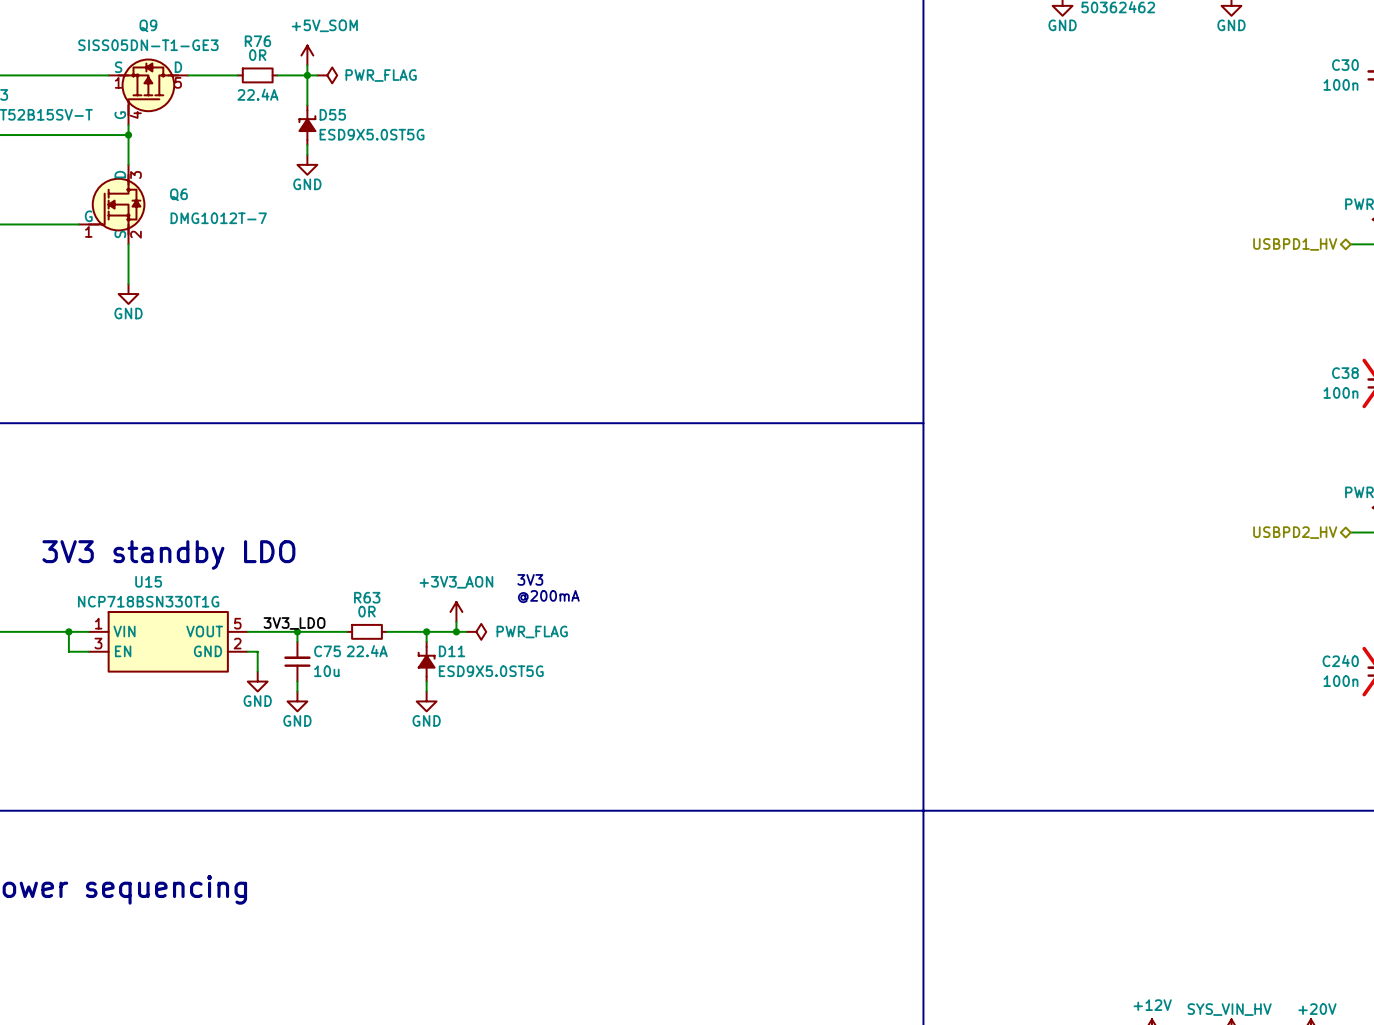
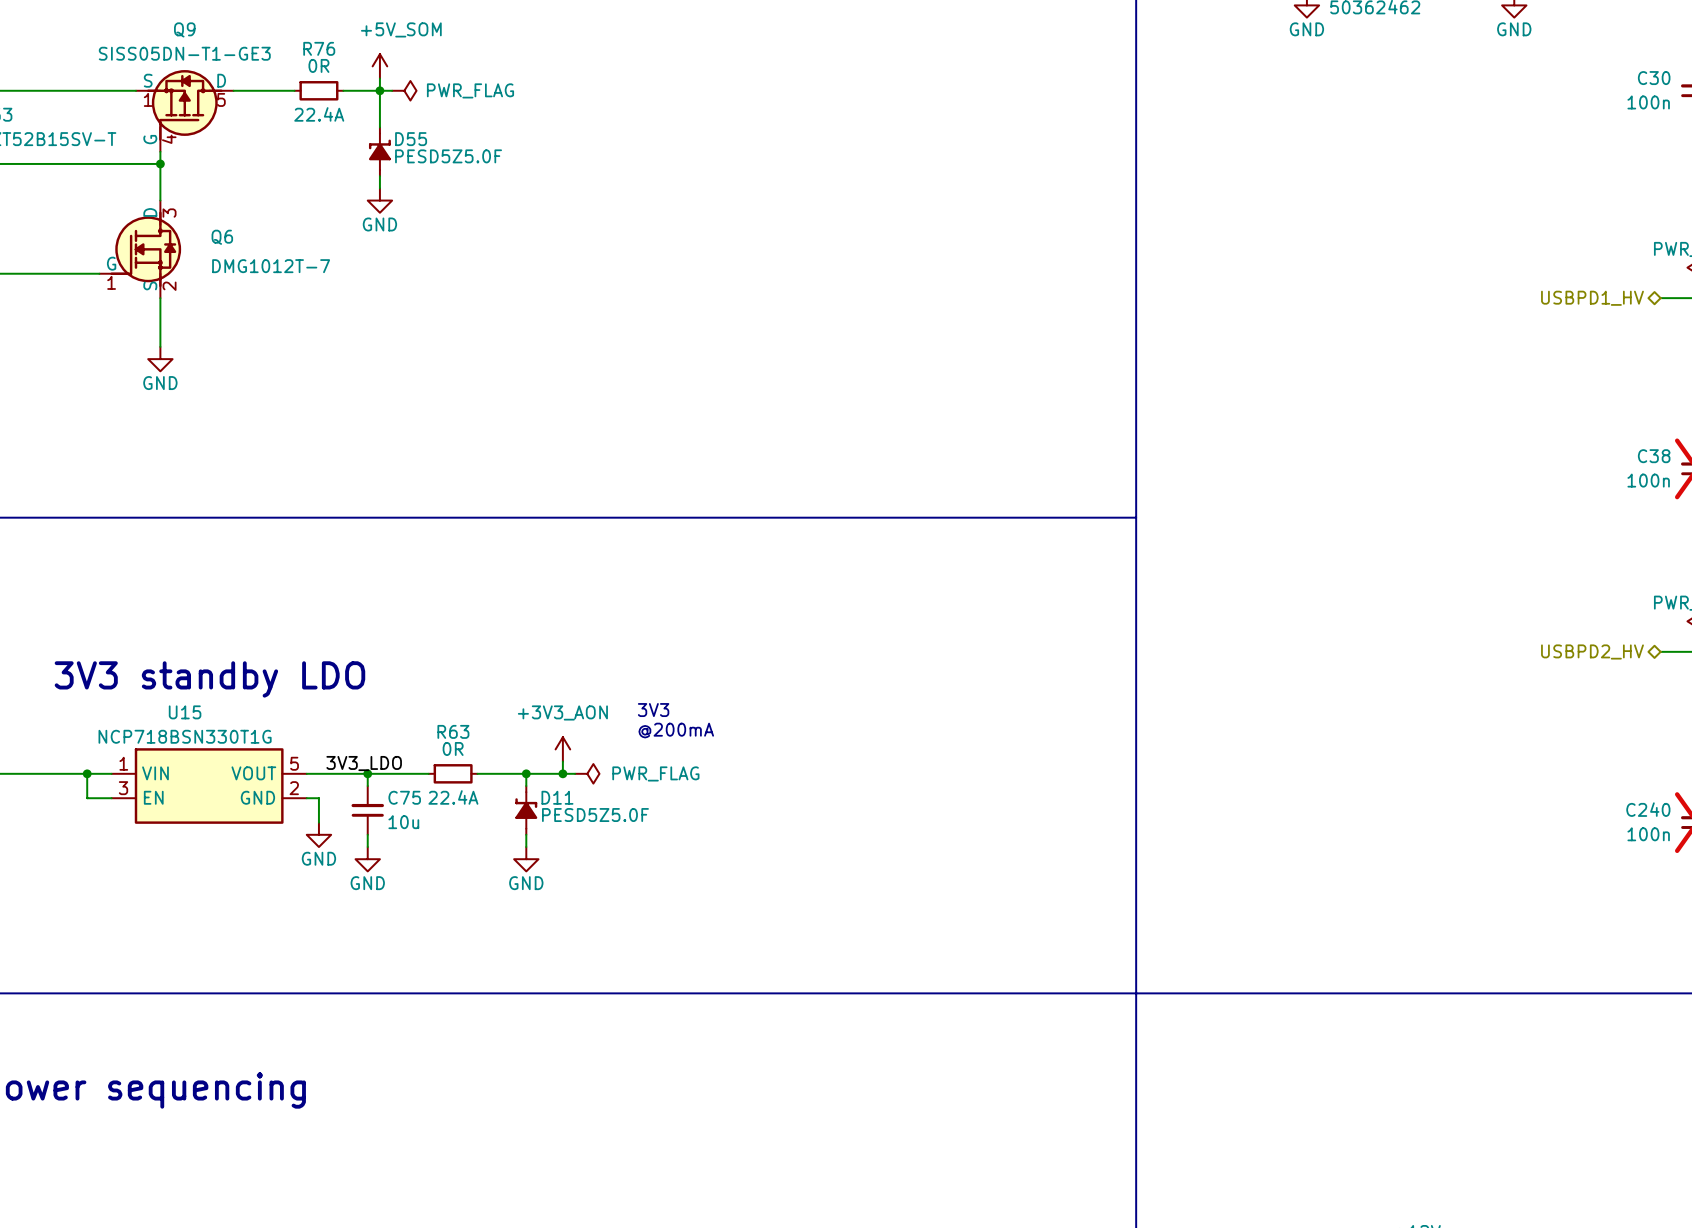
D55 text: ESD9X5.0ST5G (372, 134) -> PESD5Z5.0F (448, 156)
D11 text: ESD9X5.0ST5G (491, 671) -> PESD5Z5.0F (595, 815)

